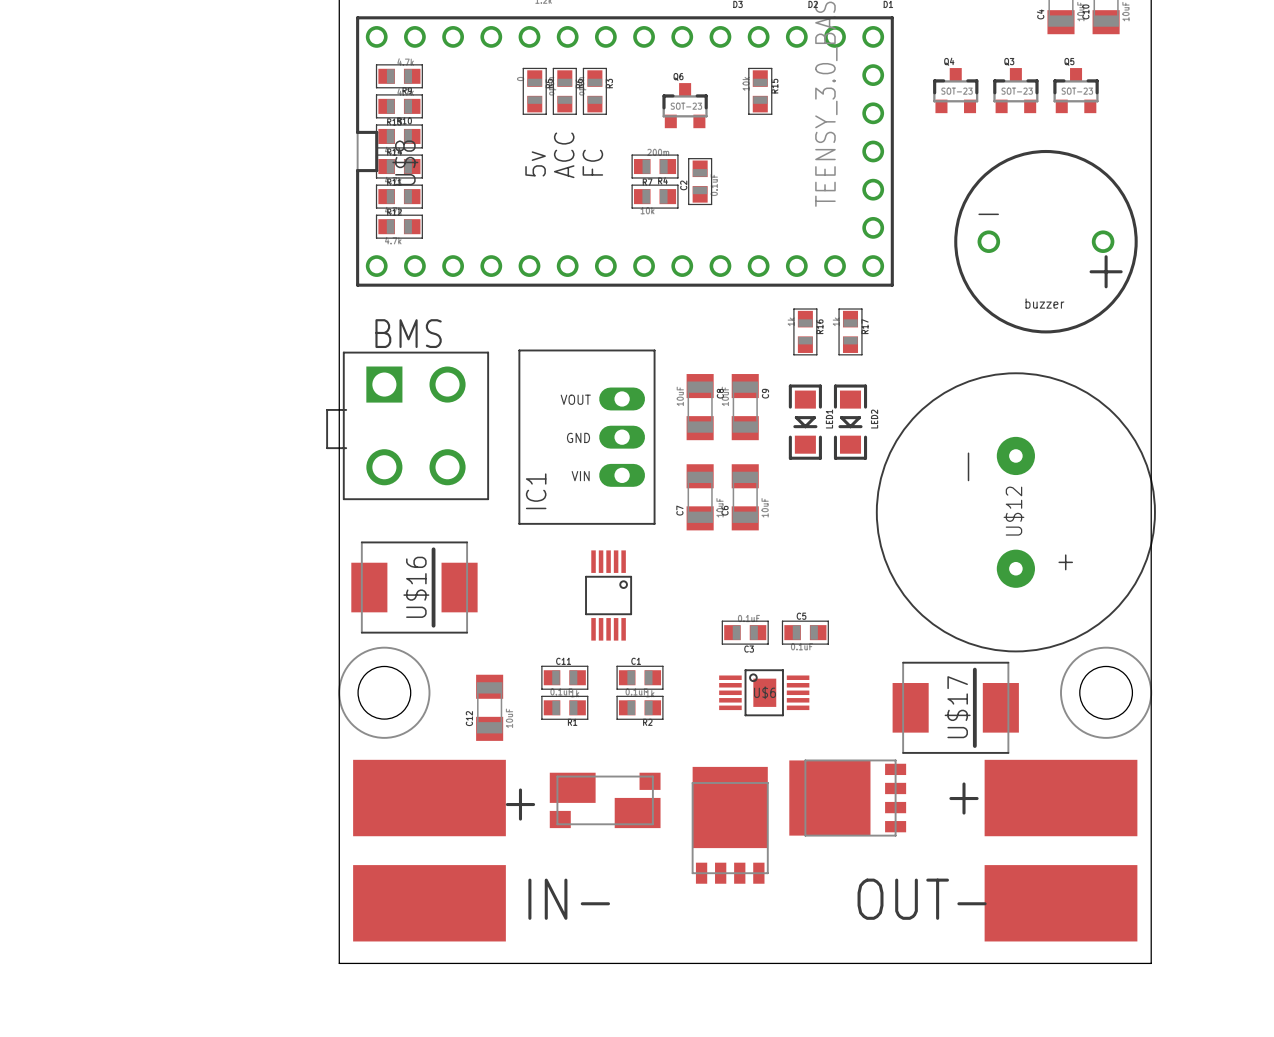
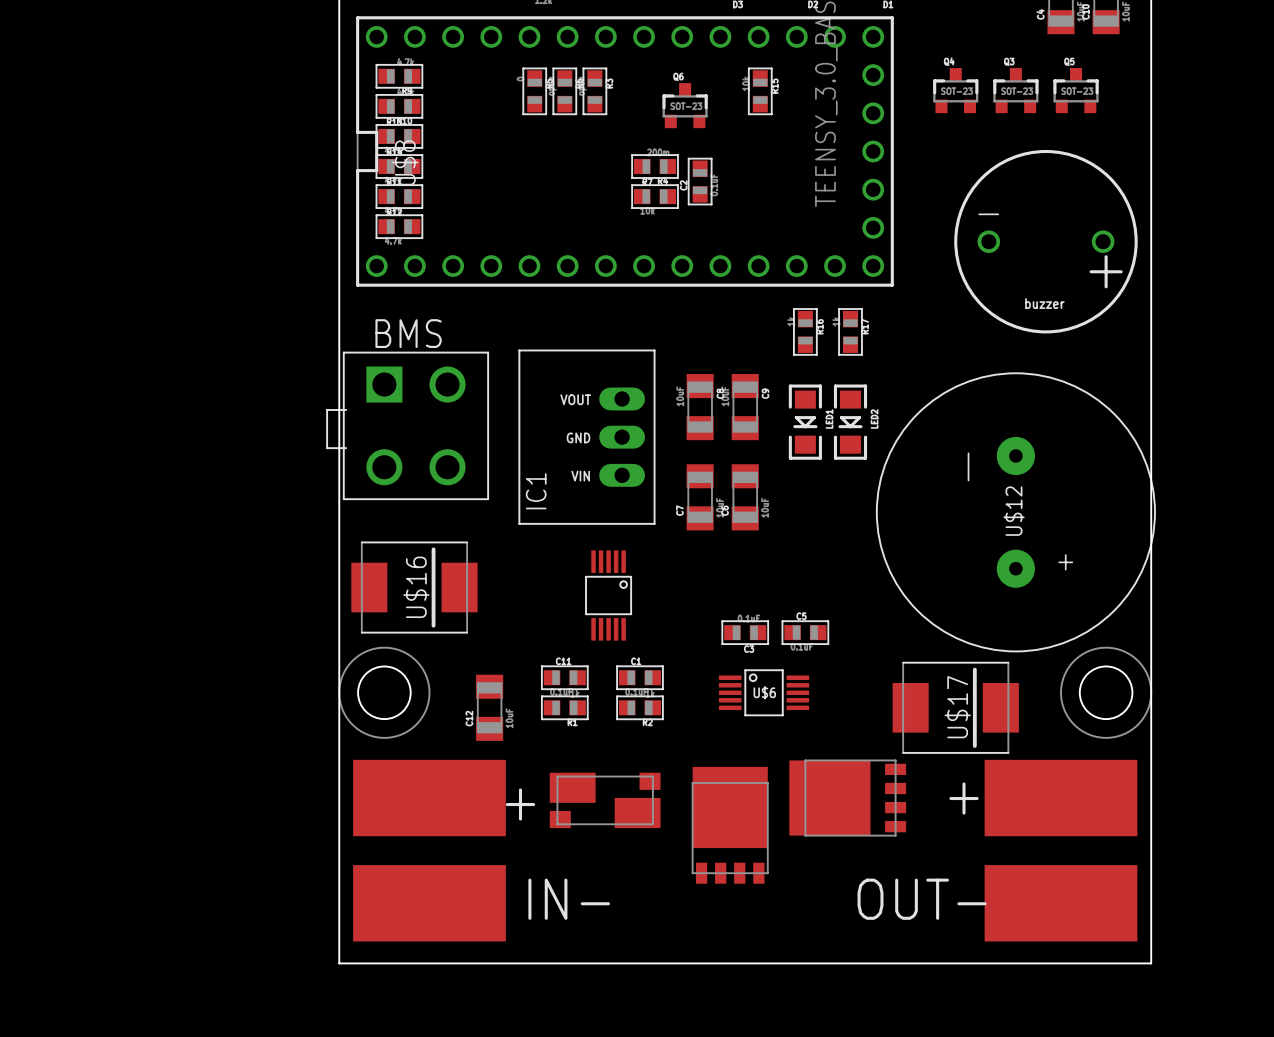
text: ACC (564, 155) -> none
text: FC (592, 162) -> none
text: 5v (535, 163) -> none
U$6 footprint: [719, 669, 810, 717] -> [718, 669, 810, 717]

